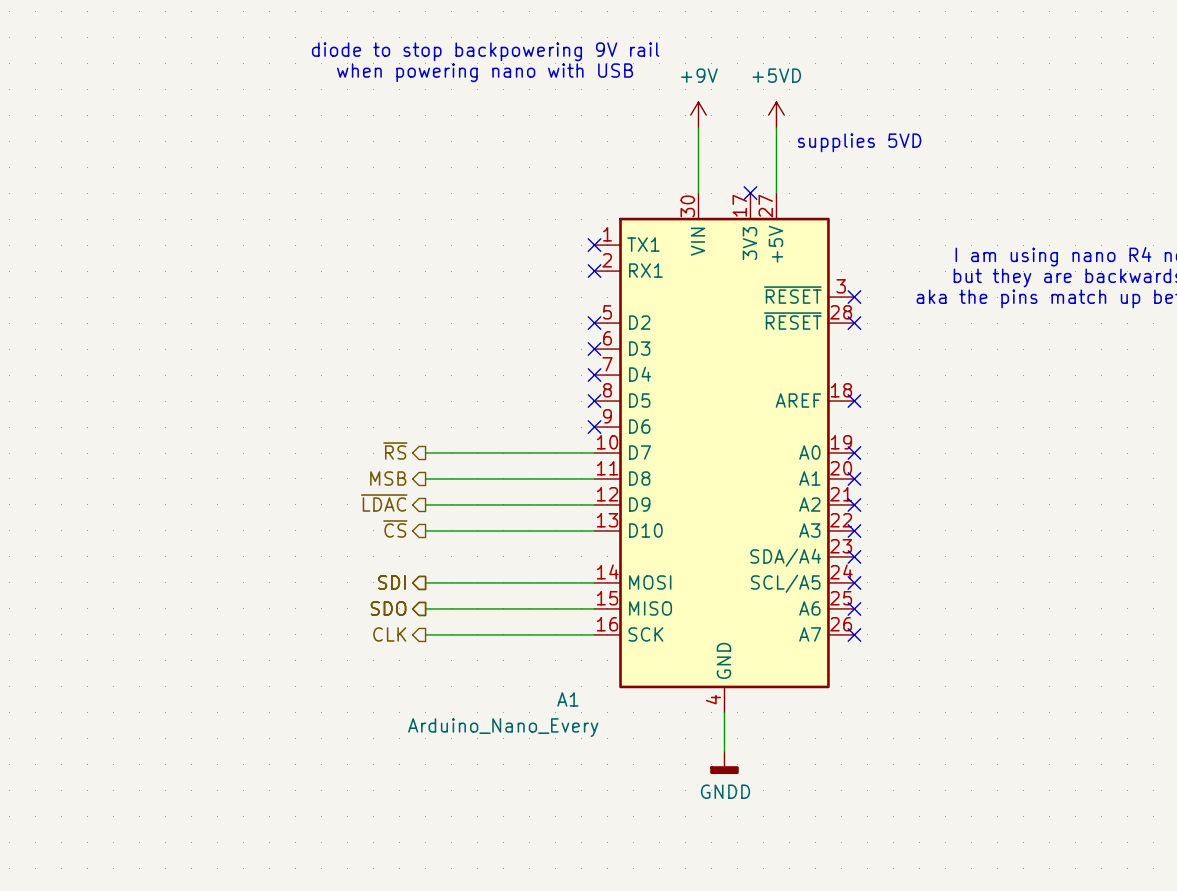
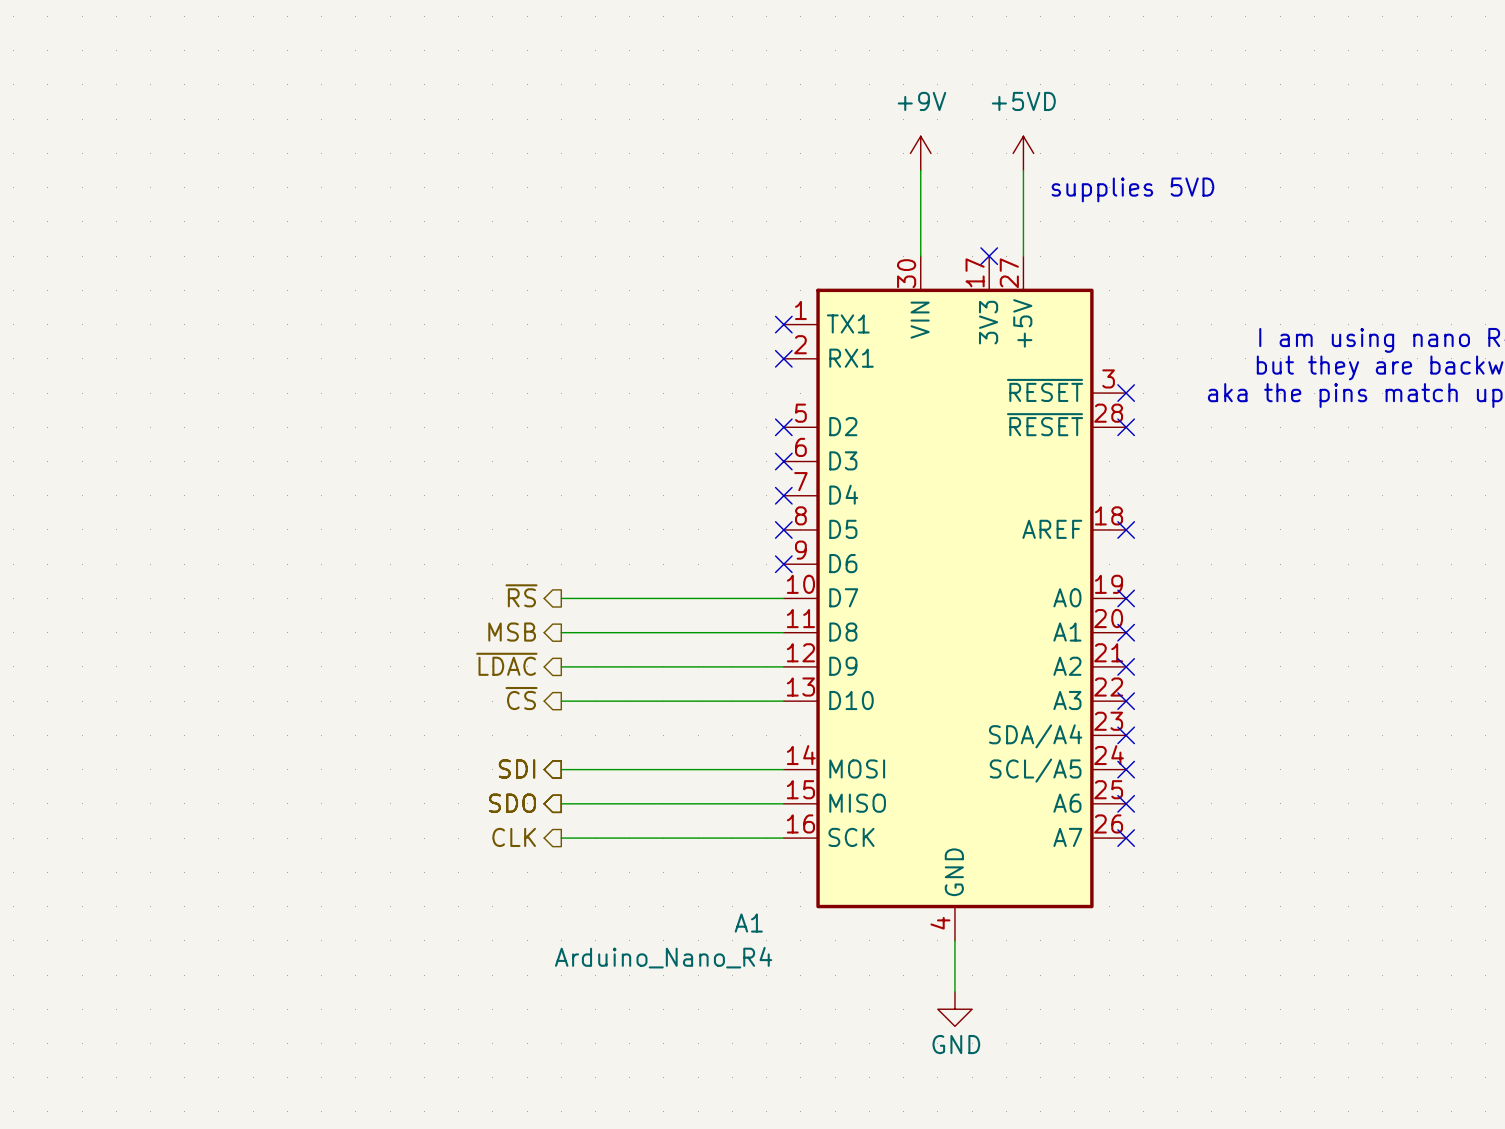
text: diode to stop backpowering 9V rail (485, 51) -> none
text: when powering nano with USB (485, 72) -> none
A1 value: Arduino_Nano_Every (503, 727) -> Arduino_Nano_R4 (663, 957)
power symbol: GNDD (724, 762) -> GND (954, 1009)

